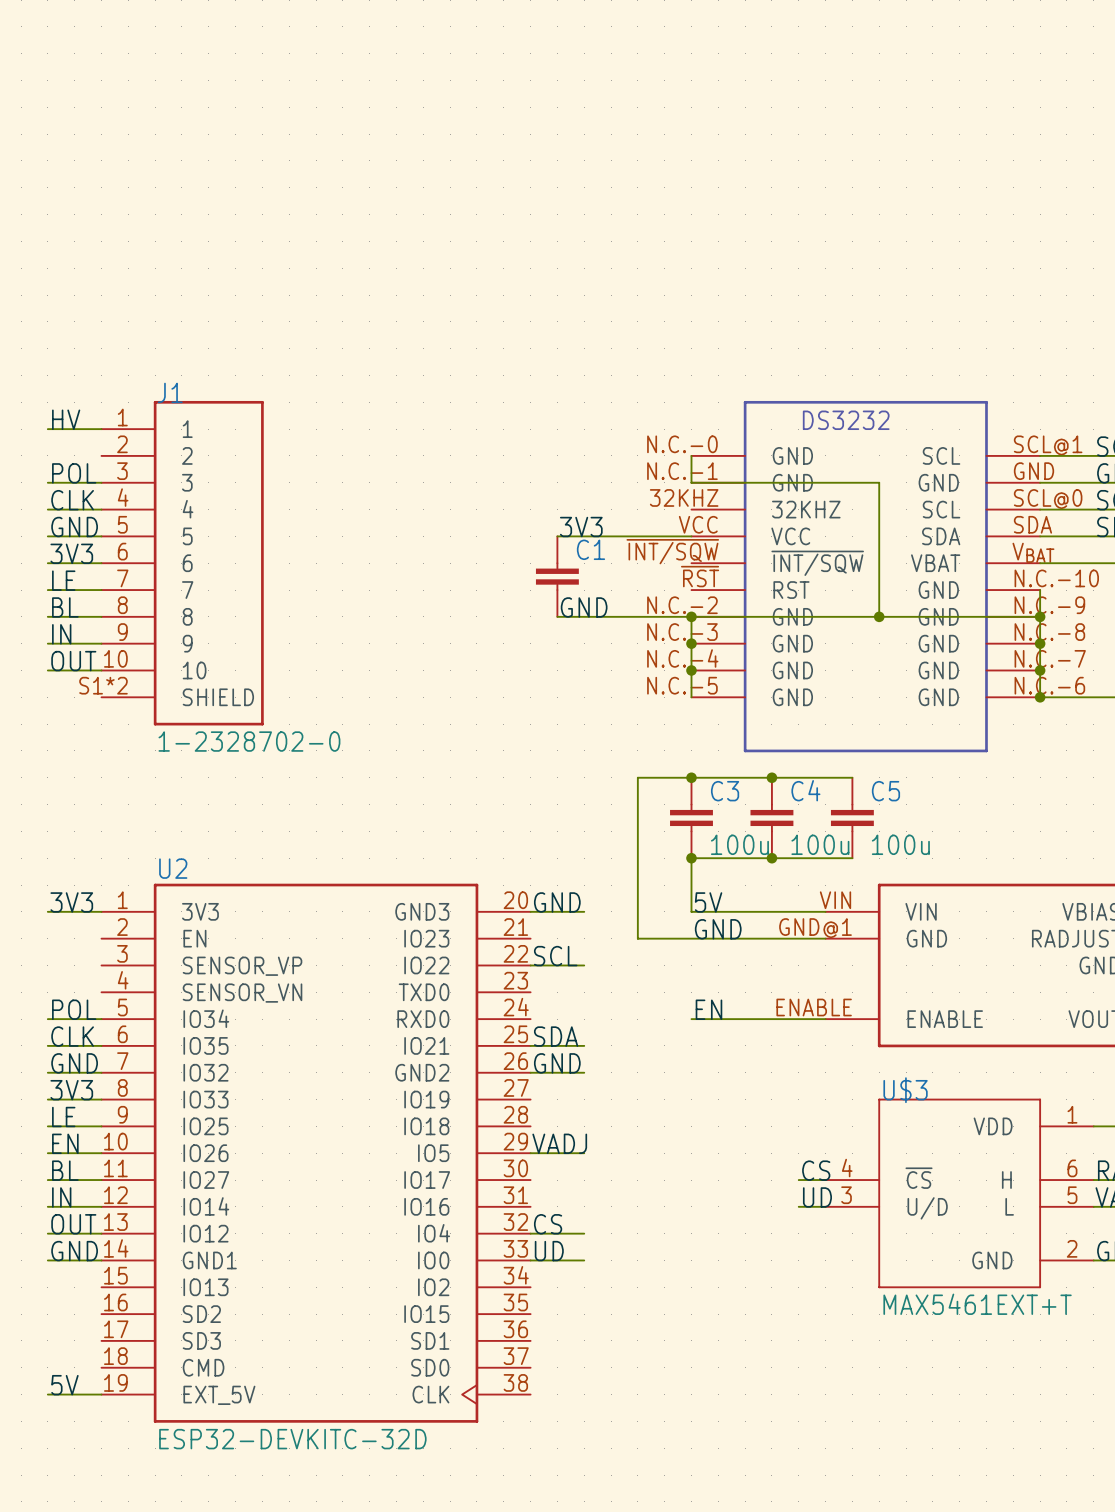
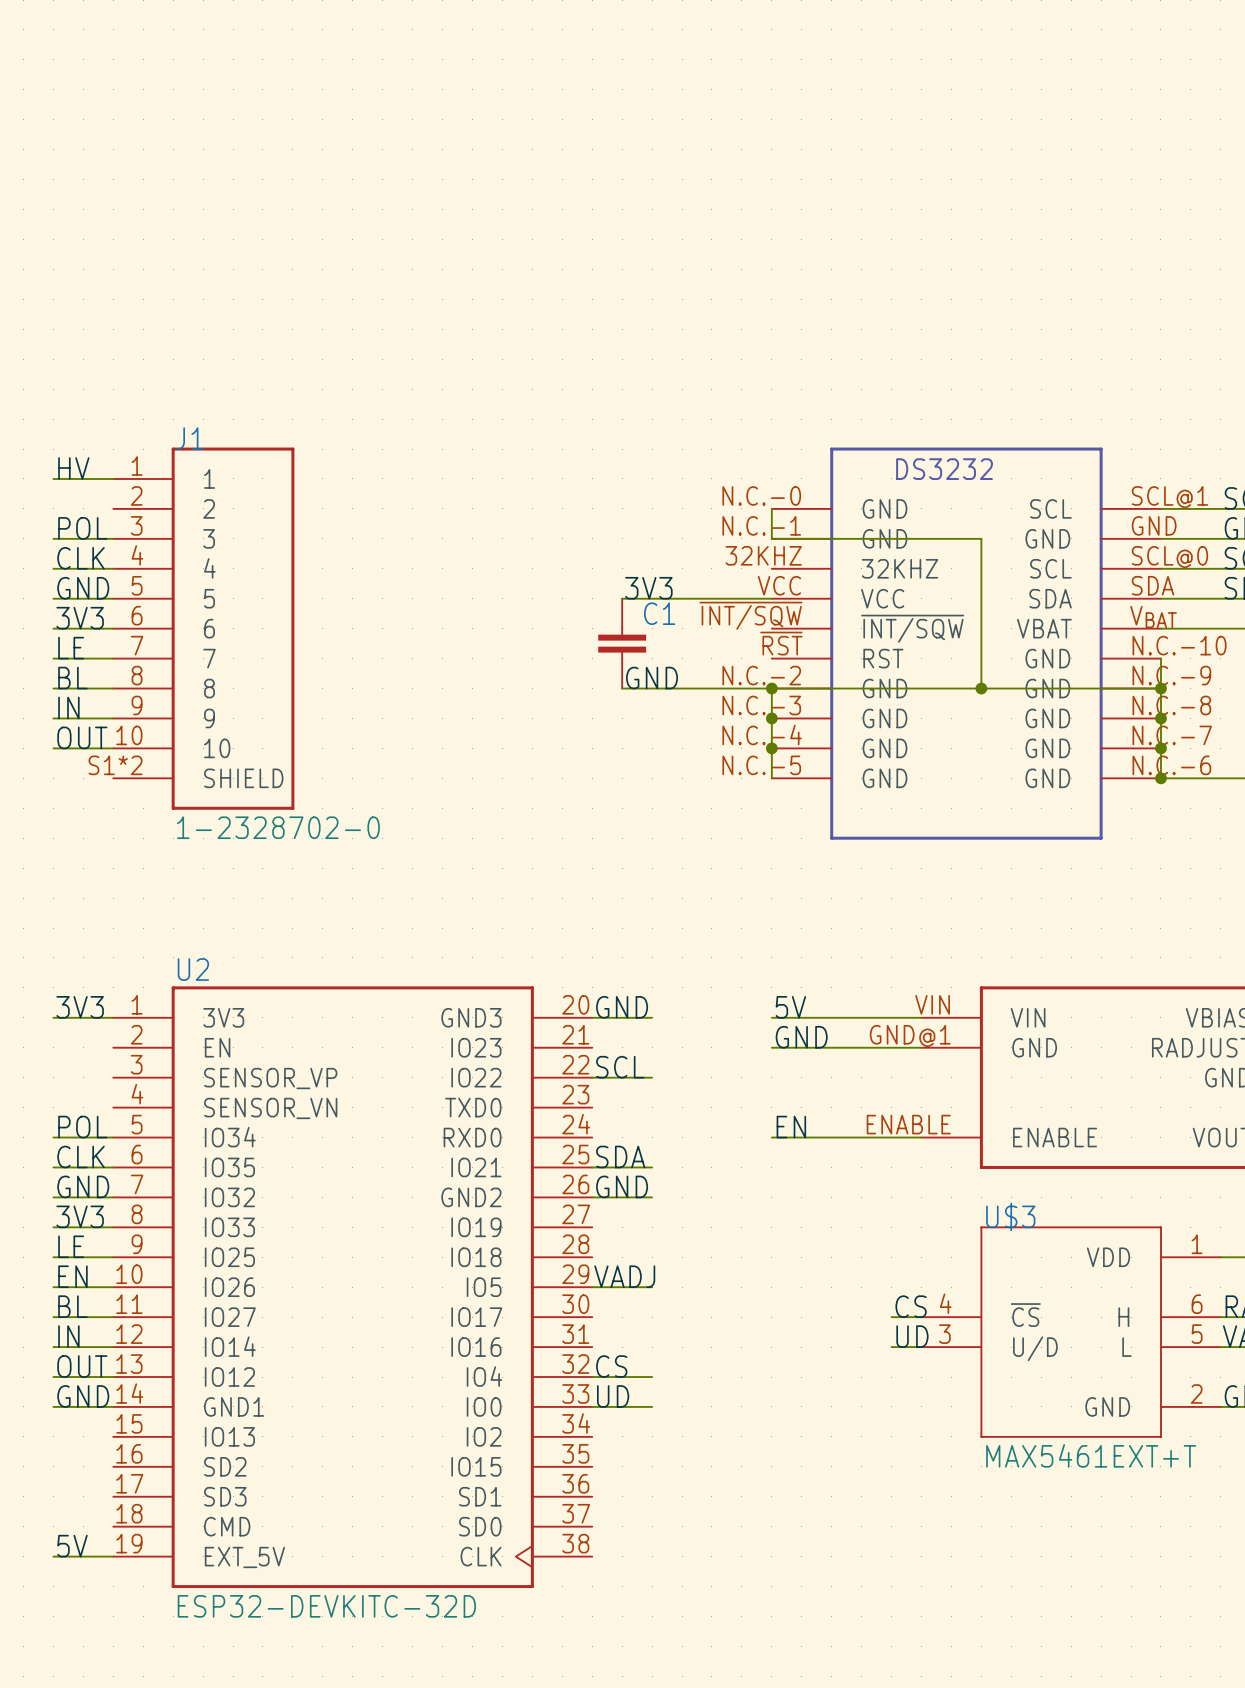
junction: (691, 777) -> none
junction: (771, 777) -> none
wire: (852, 777) (637, 777) (637, 938) (691, 938) -> none
C3: 100u (691, 817) -> none
C4: 100u (771, 817) -> none
C5: 100u (852, 817) -> none
junction: (691, 858) -> none
junction: (771, 858) -> none
wire: (852, 858) (691, 858) (691, 911) -> none

